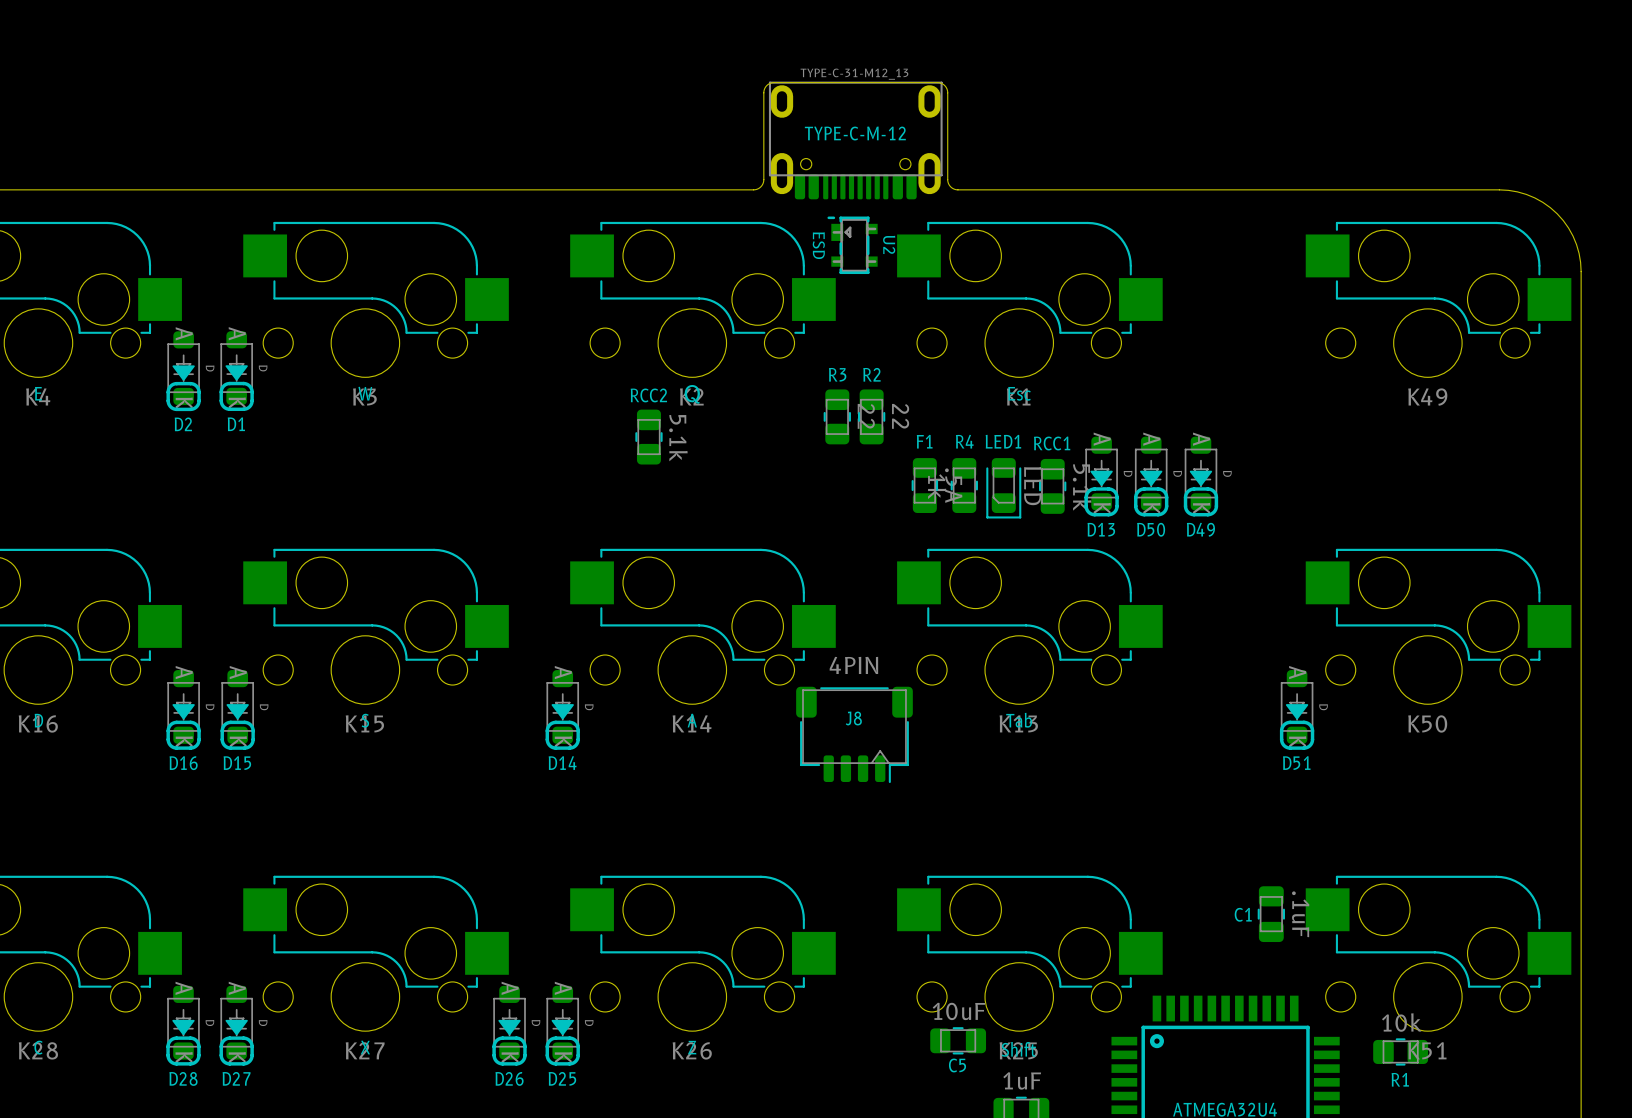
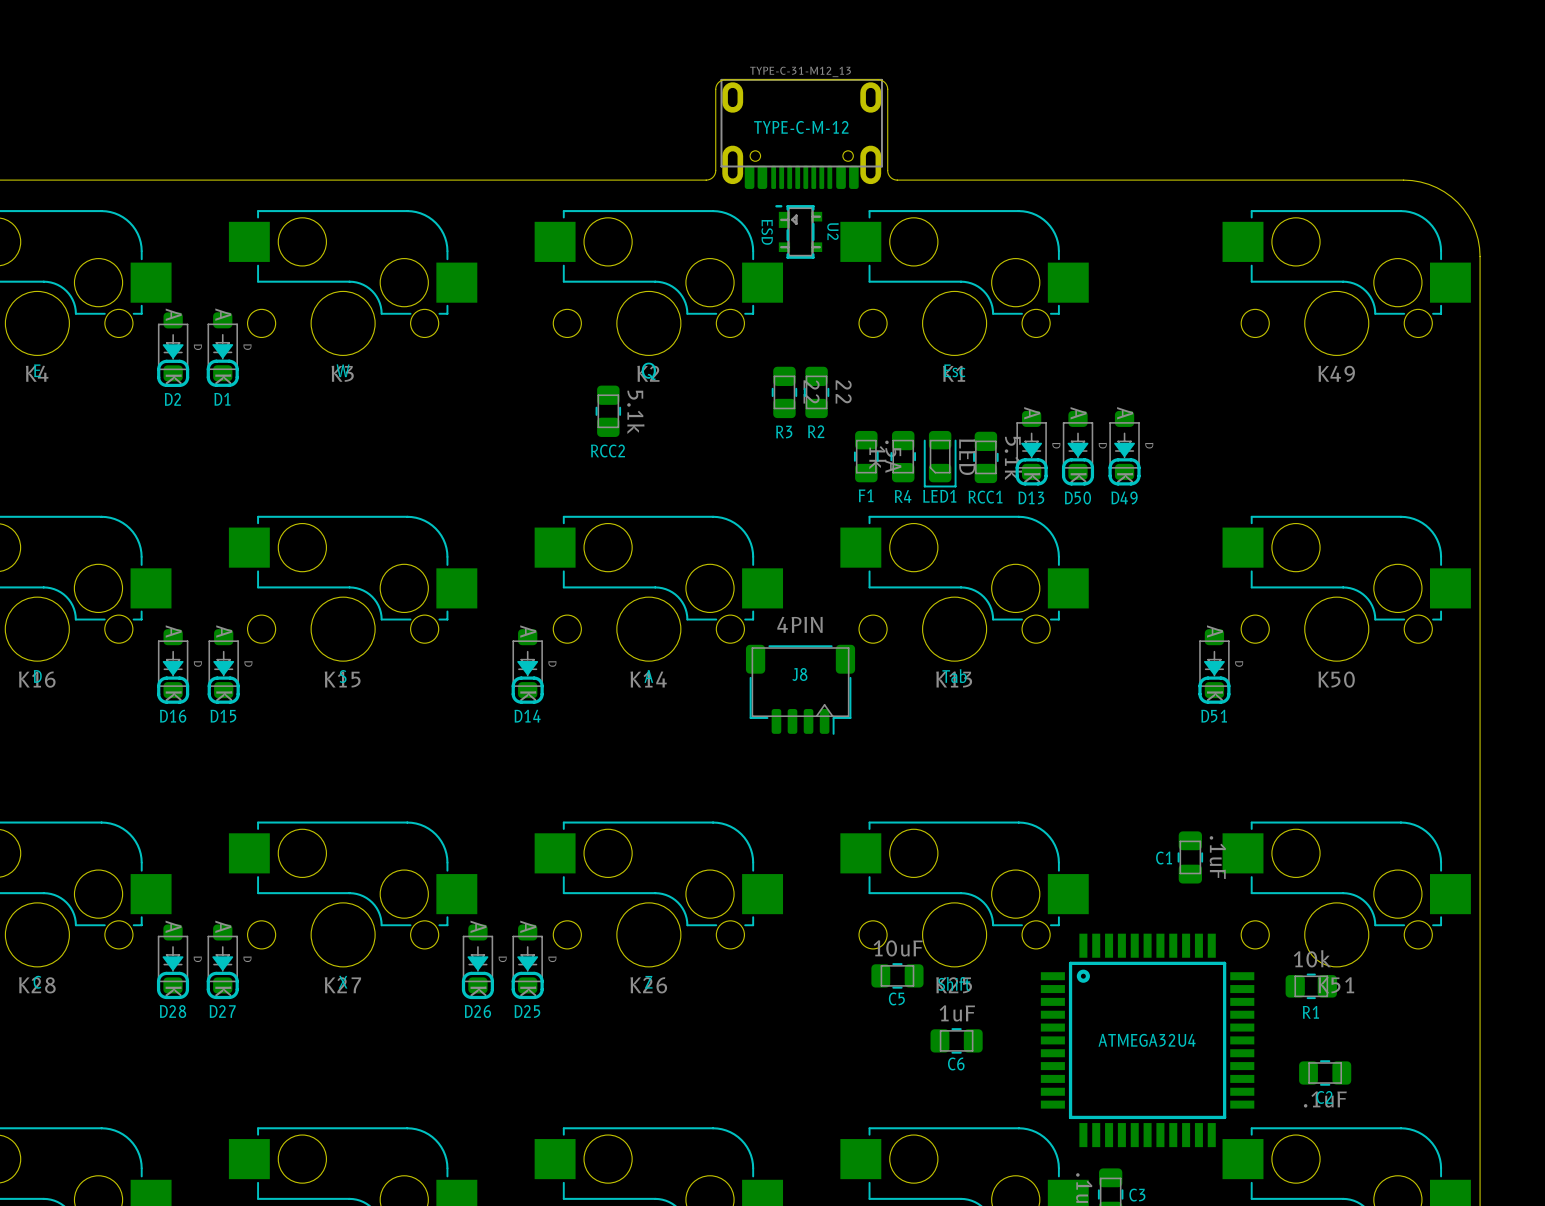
R3 name position: R3 (837, 374) -> R3 (784, 431)
R2 name position: R2 (871, 374) -> R2 (816, 431)
RCC2 name position: RCC2 (648, 395) -> RCC2 (608, 451)
F1 name position: F1 (924, 441) -> F1 (866, 495)
R4 name position: R4 (964, 441) -> R4 (903, 496)
LED1 name position: LED1 (1003, 441) -> LED1 (939, 496)
RCC1 name position: RCC1 (1052, 443) -> RCC1 (985, 497)

